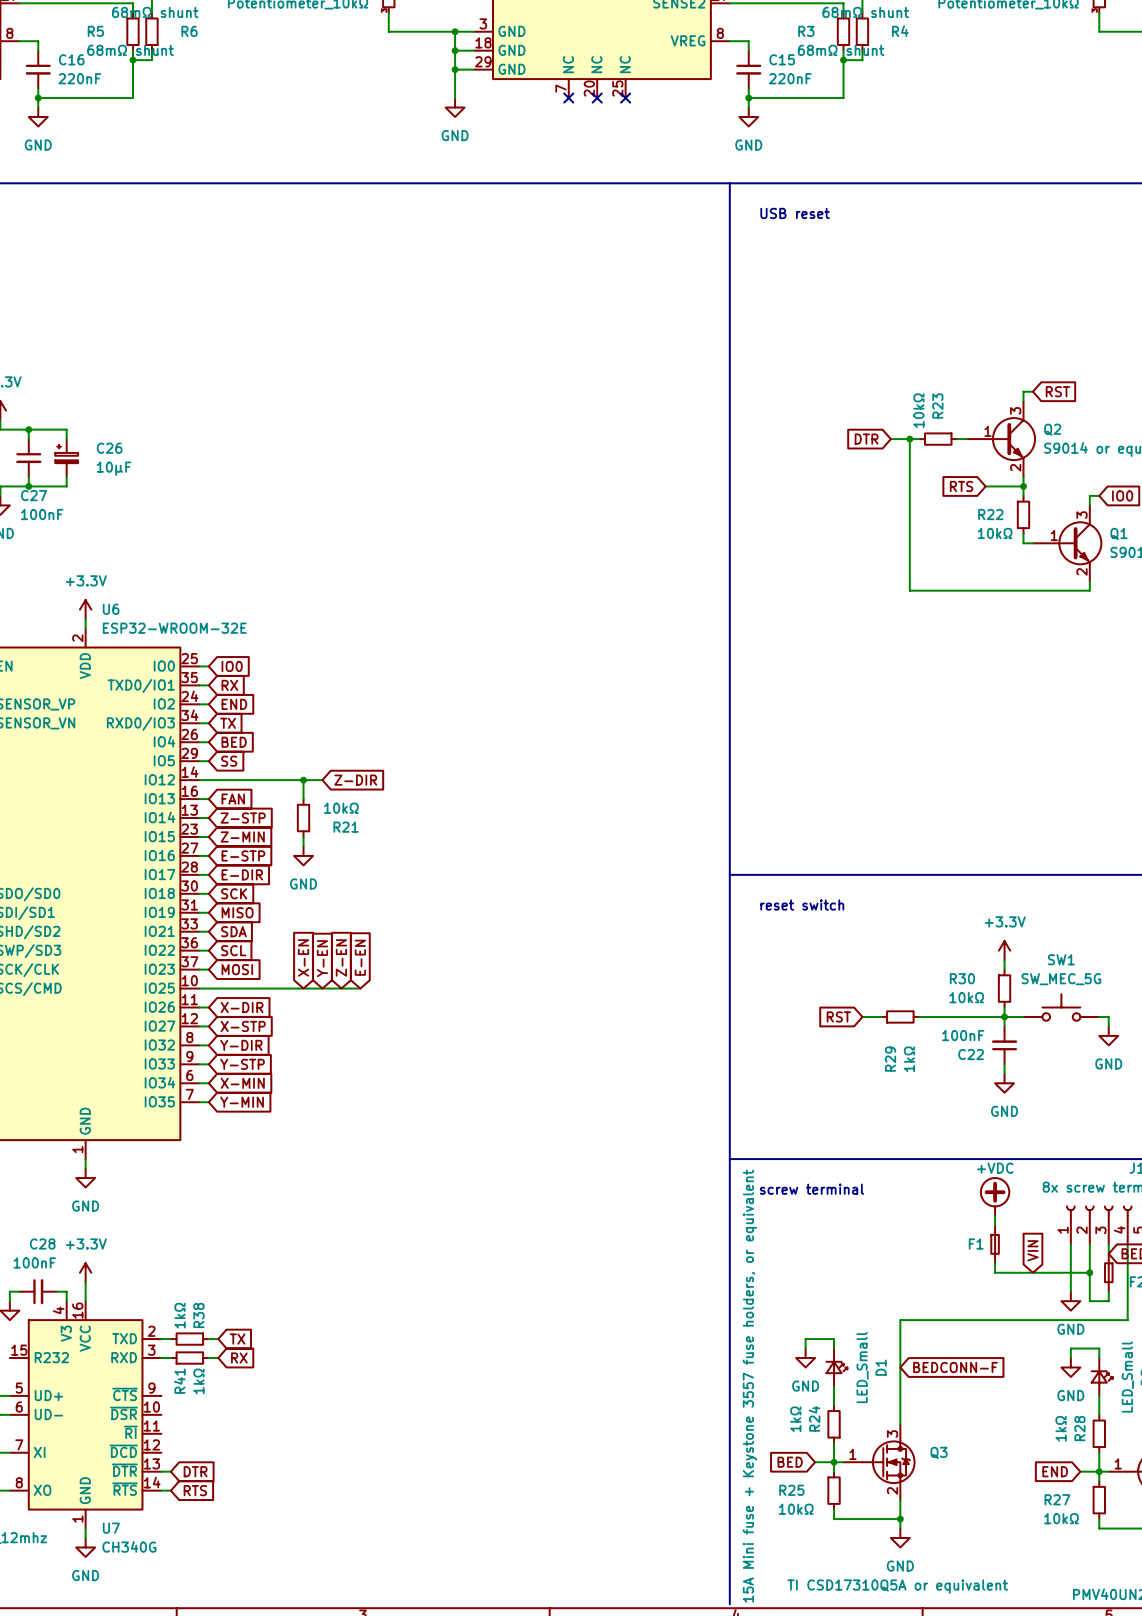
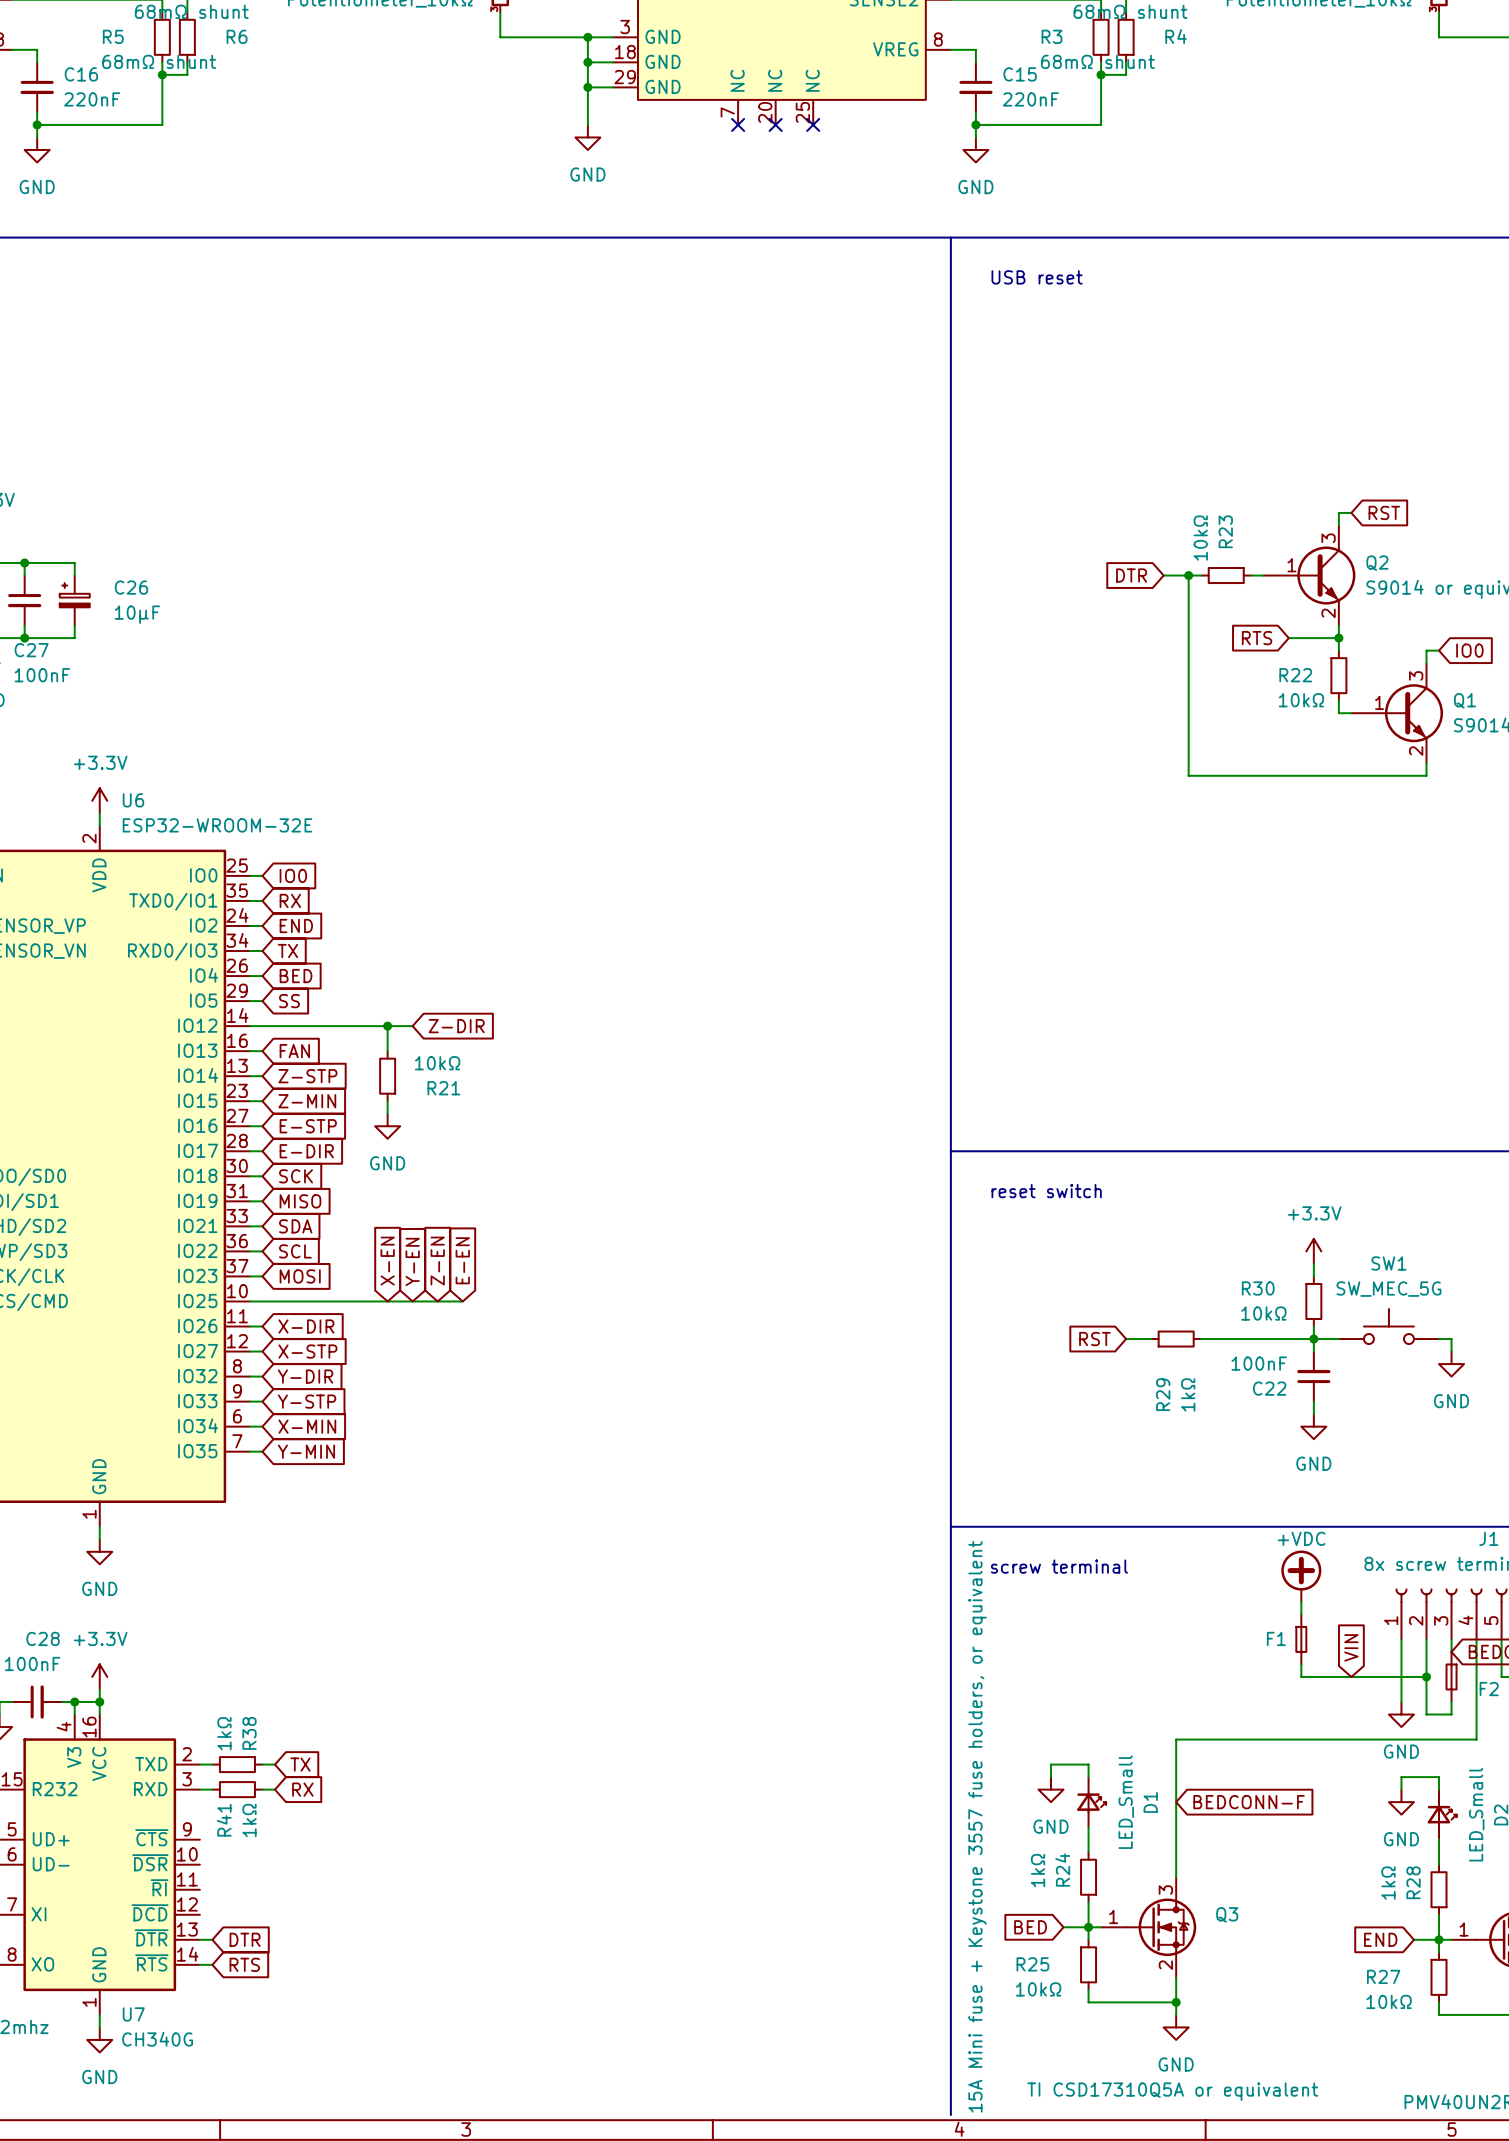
wire: none -> (74, 1702) (99, 1702)
junction: none -> (74, 1702)
junction: none -> (99, 1702)

